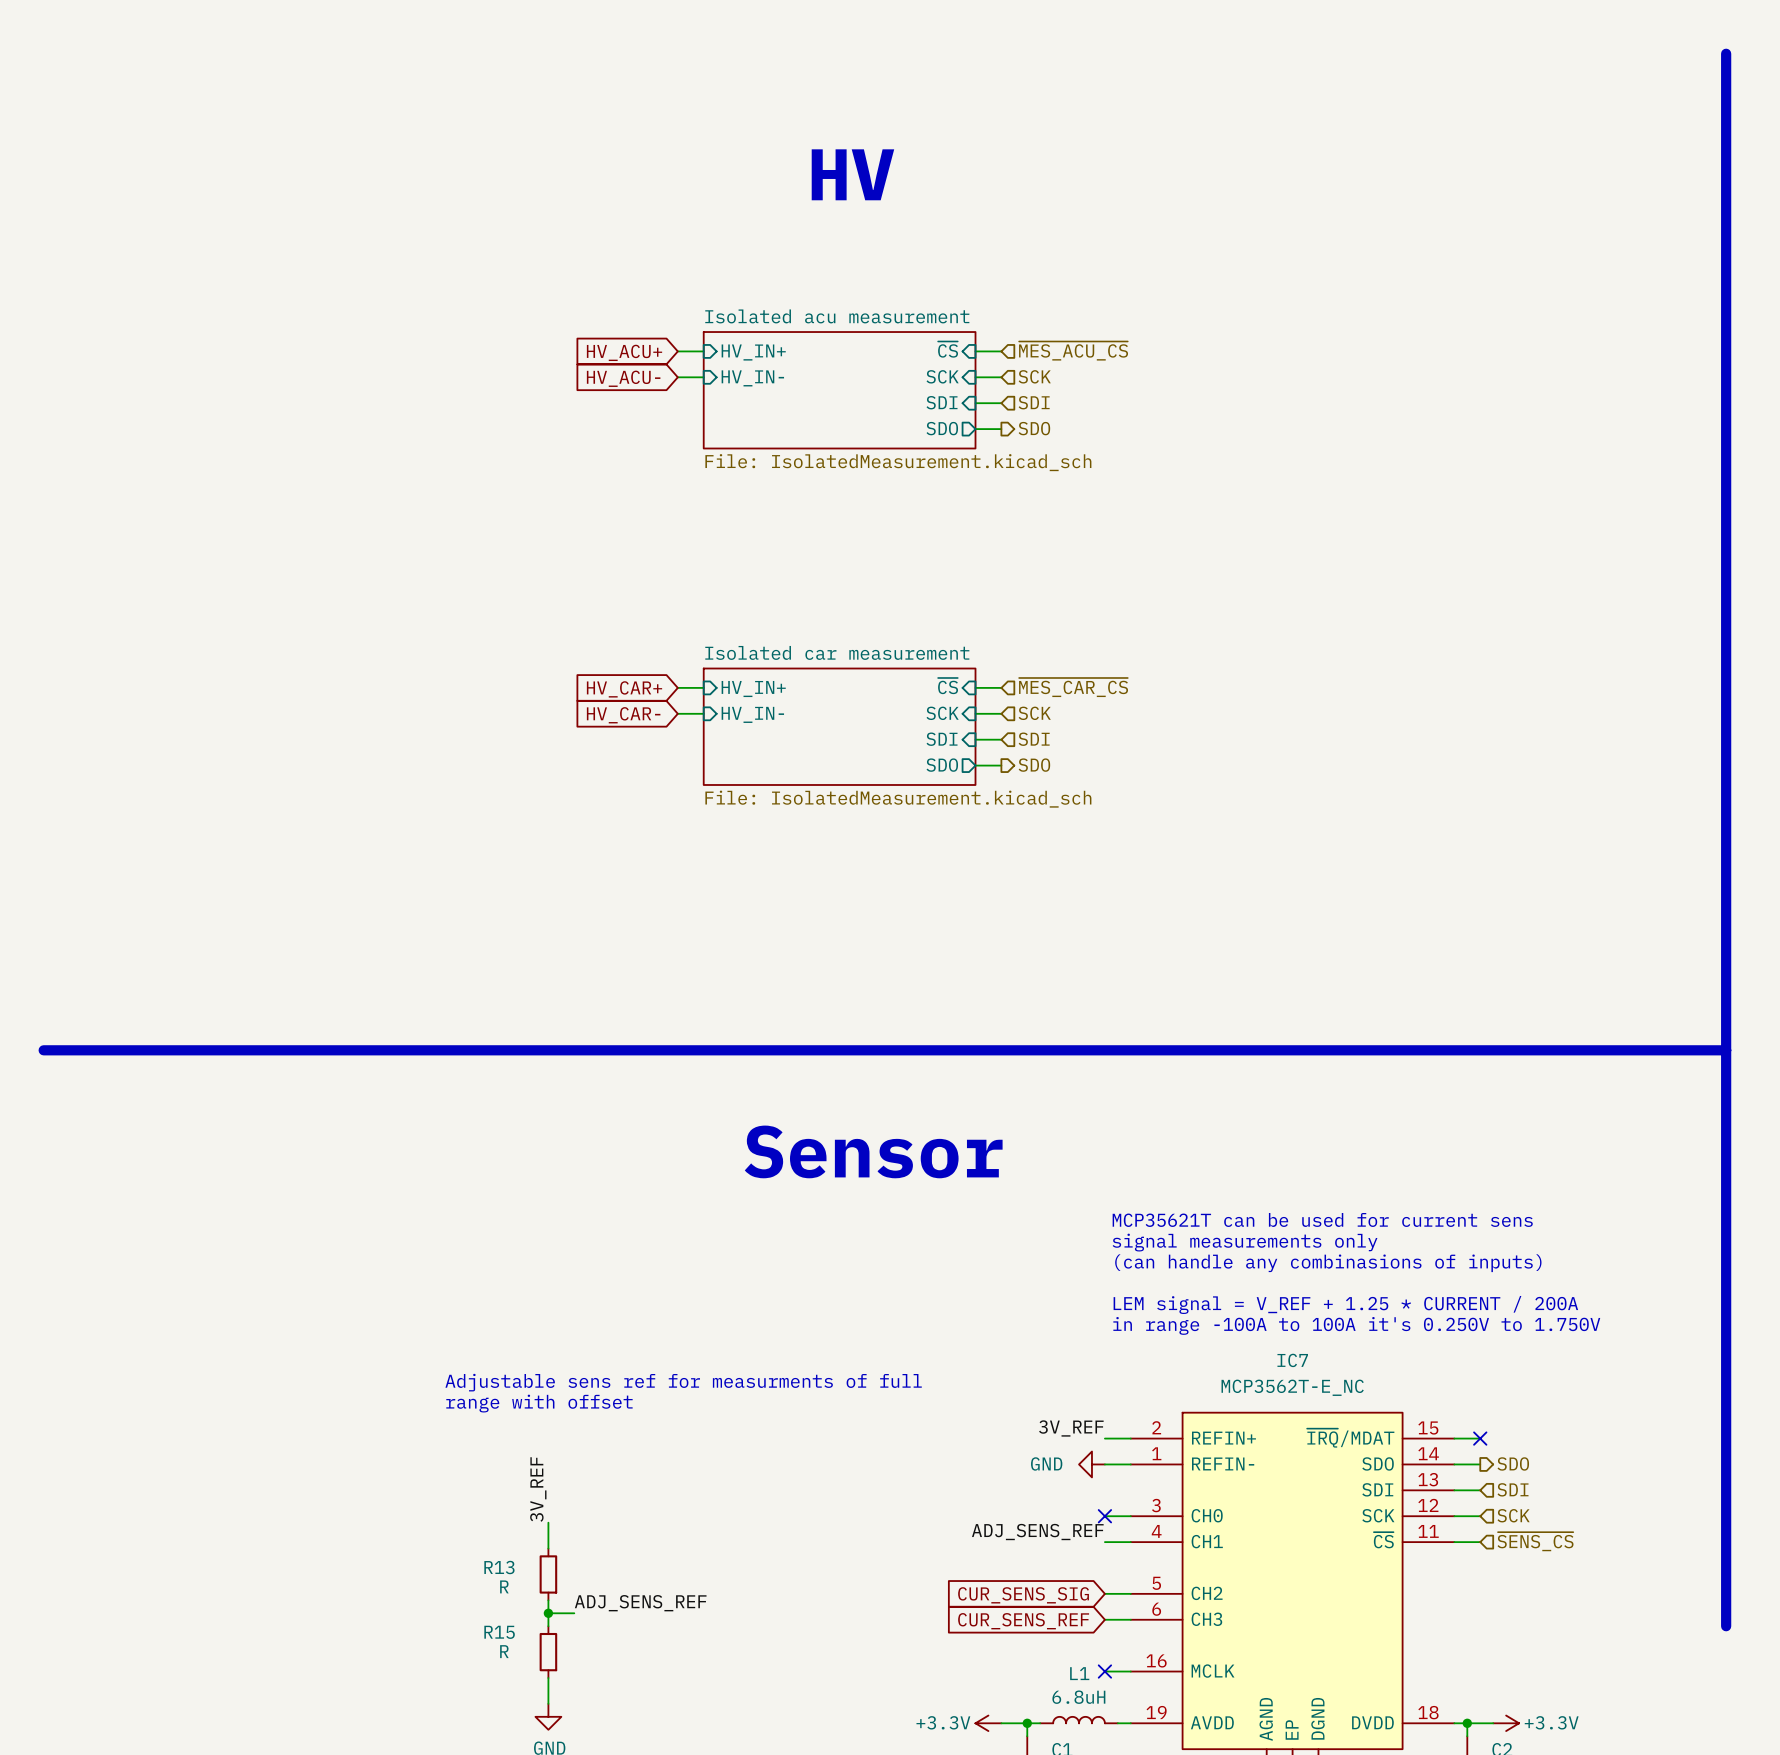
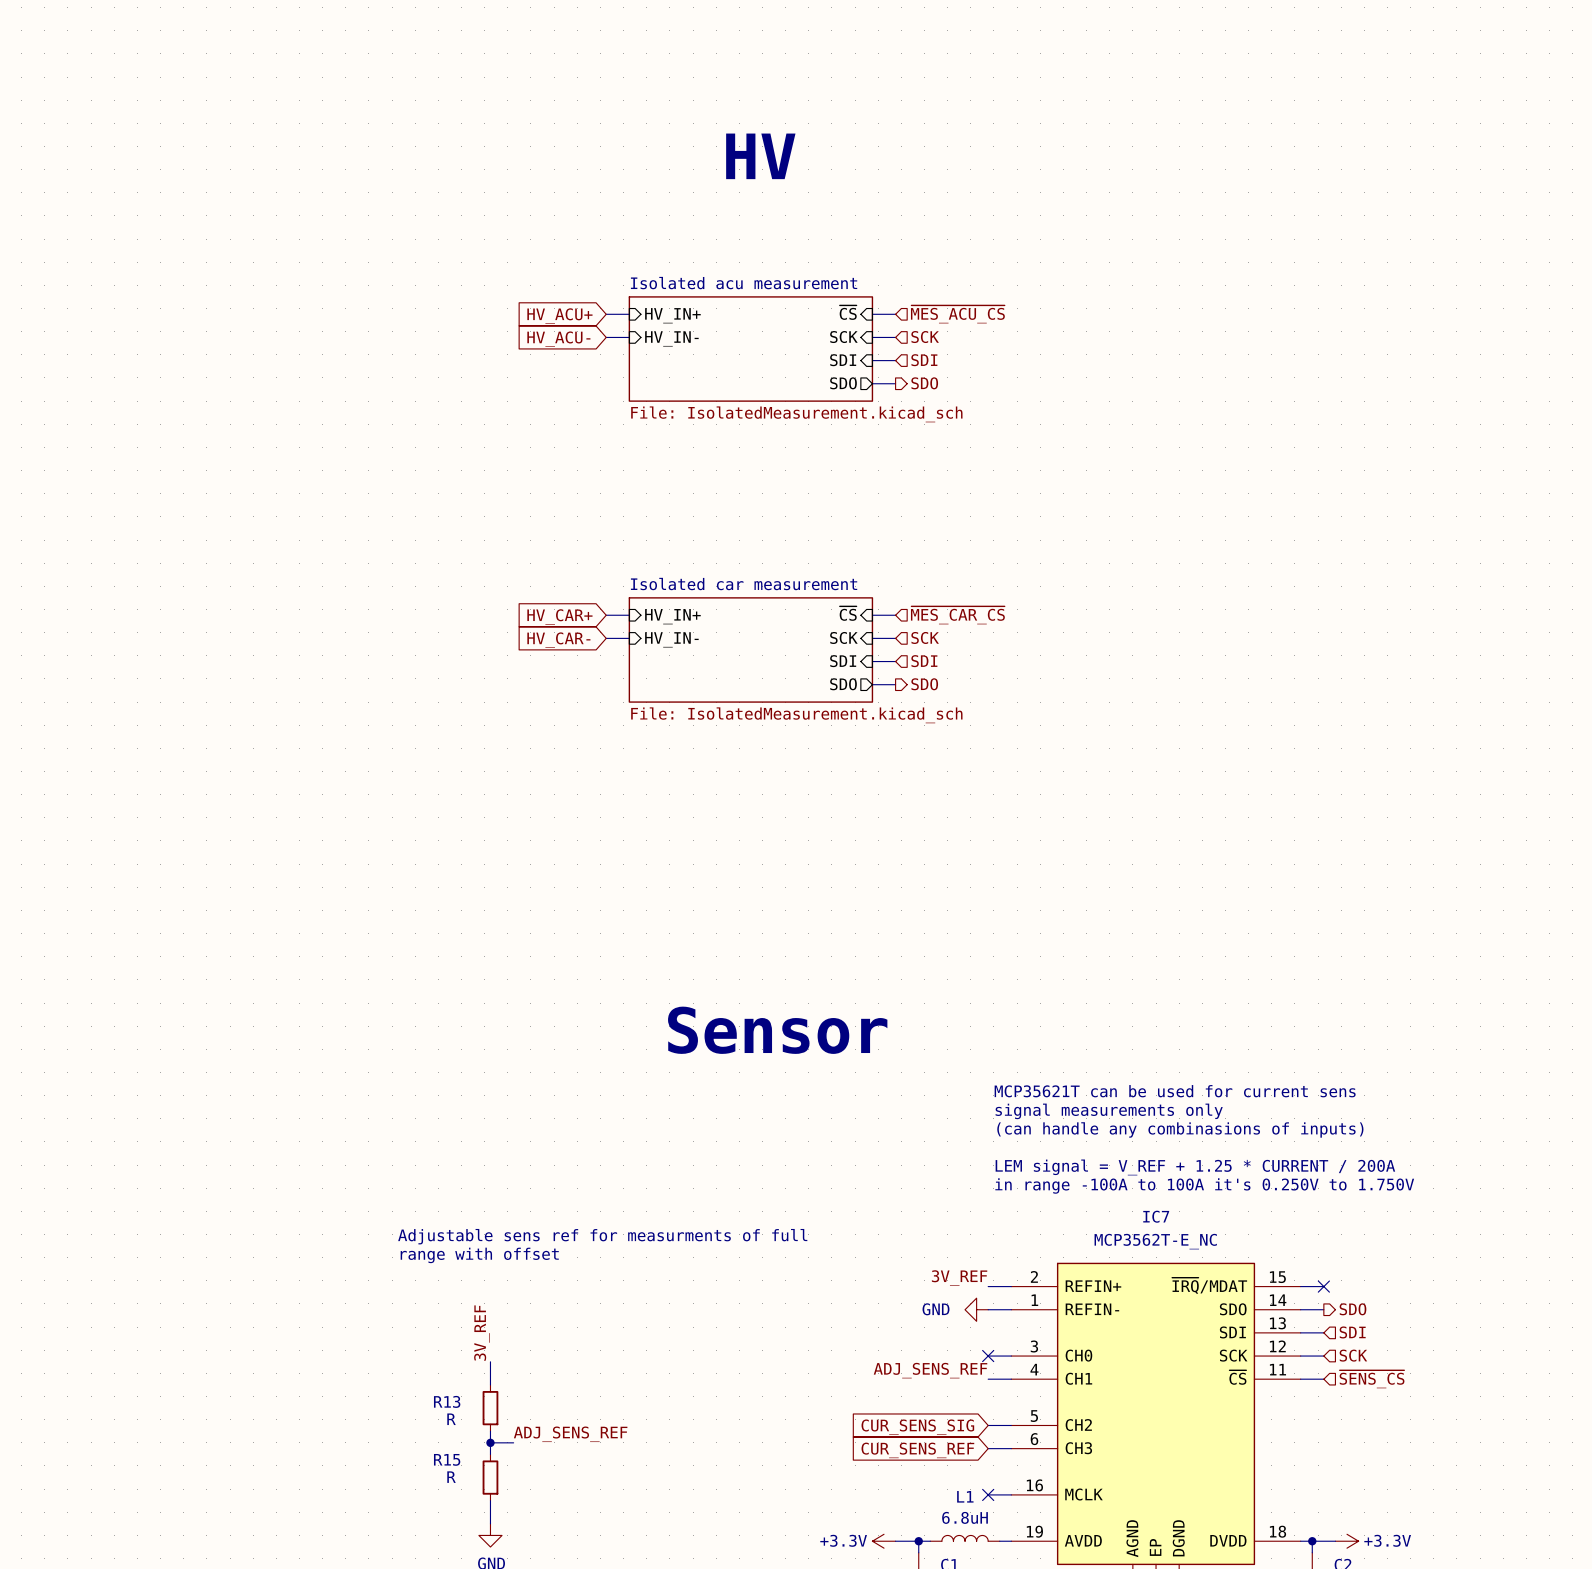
line: (1726, 53) (1726, 1626) -> none
line: (43, 1050) (1726, 1050) -> none

